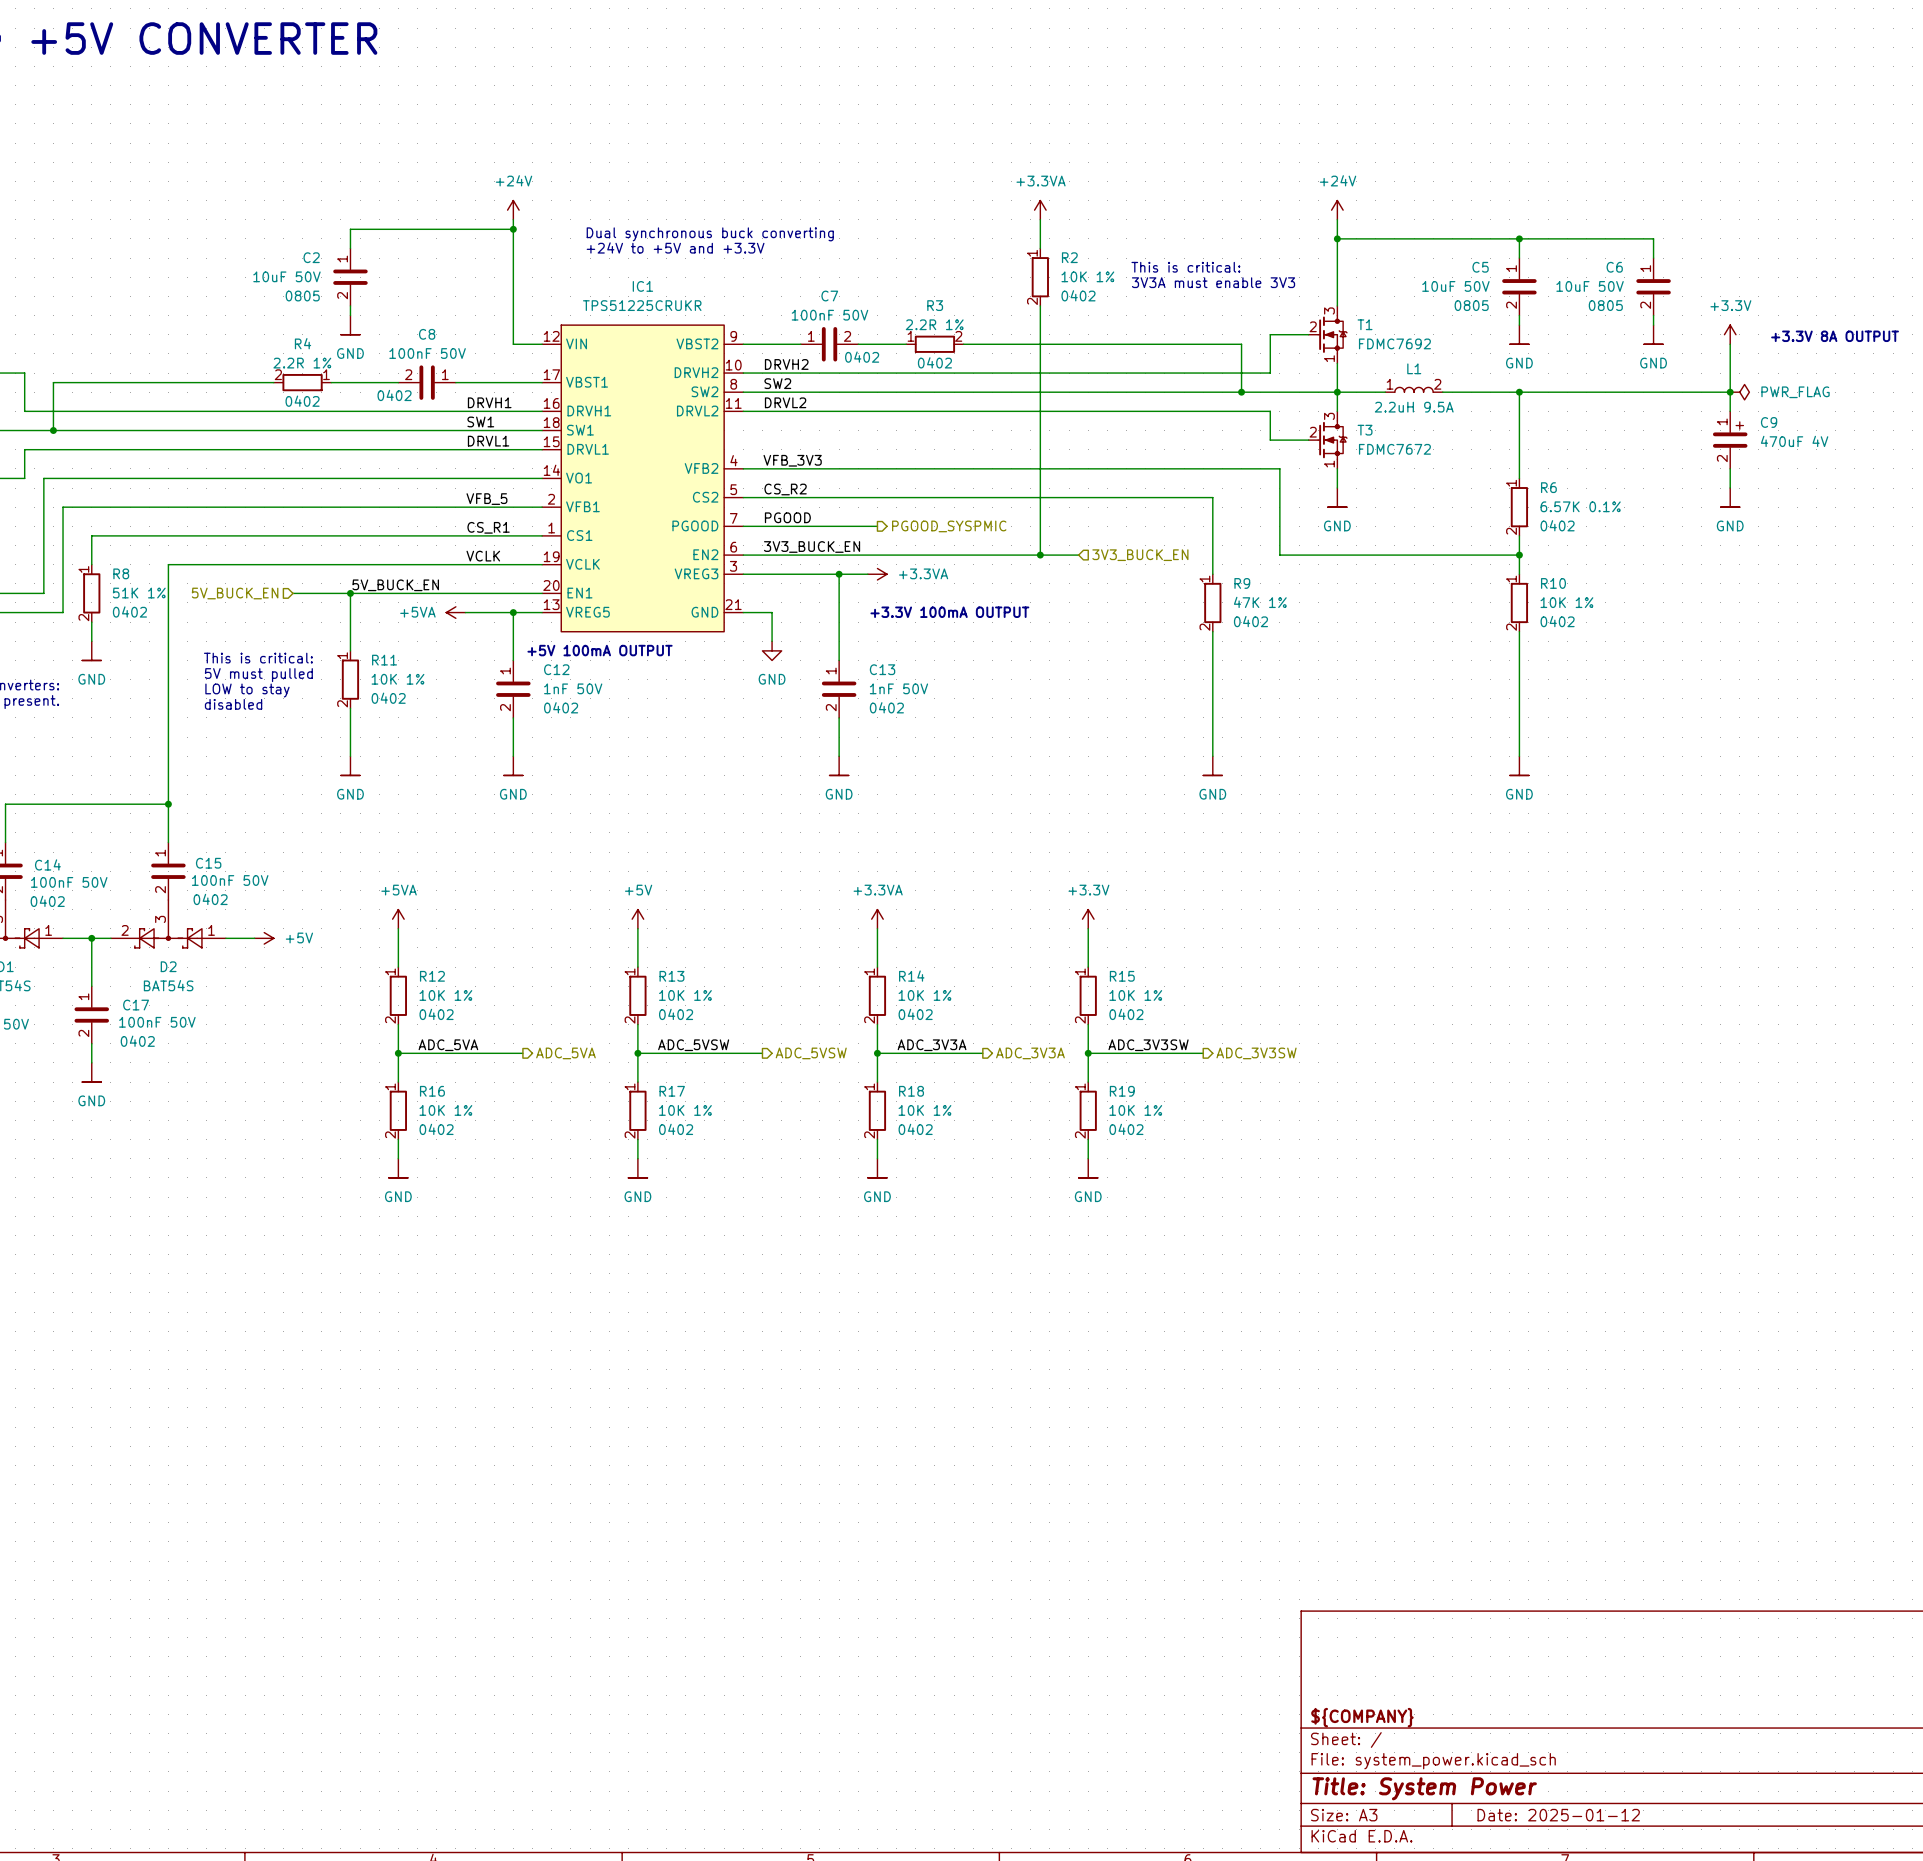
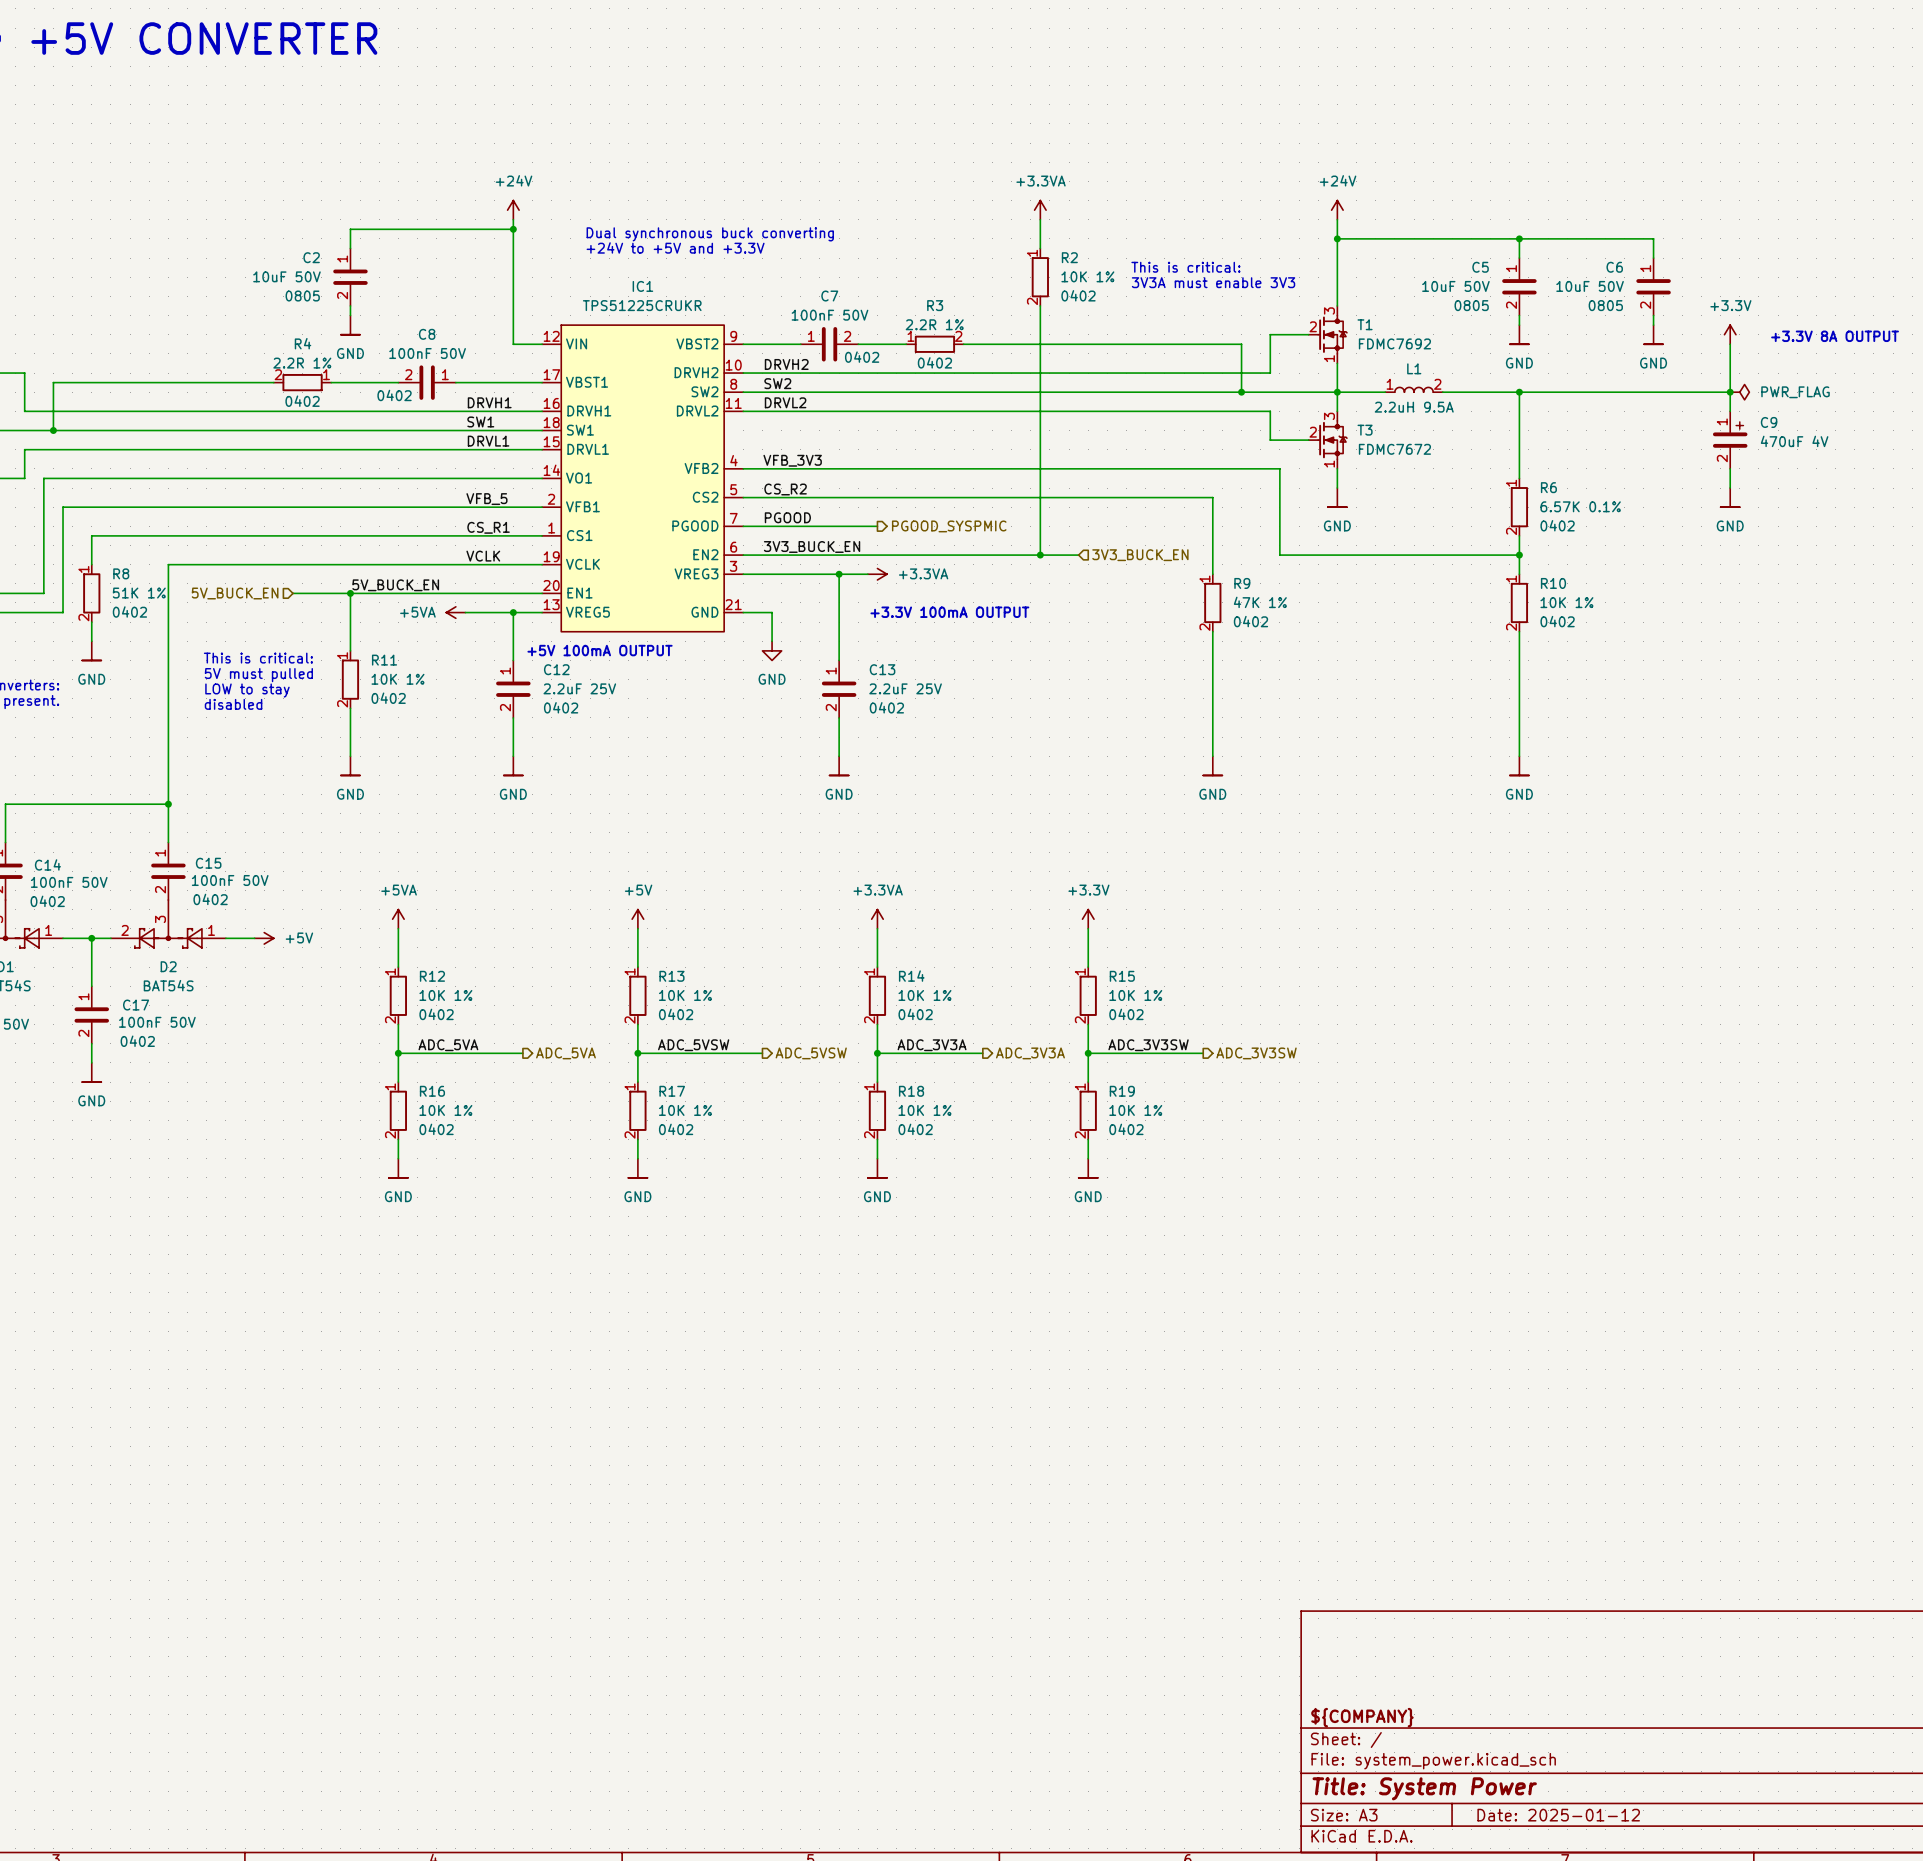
C12 value: 1nF 50V (573, 688) -> 2.2uF 25V (579, 688)
C13 value: 1nF 50V (898, 688) -> 2.2uF 25V (905, 688)

